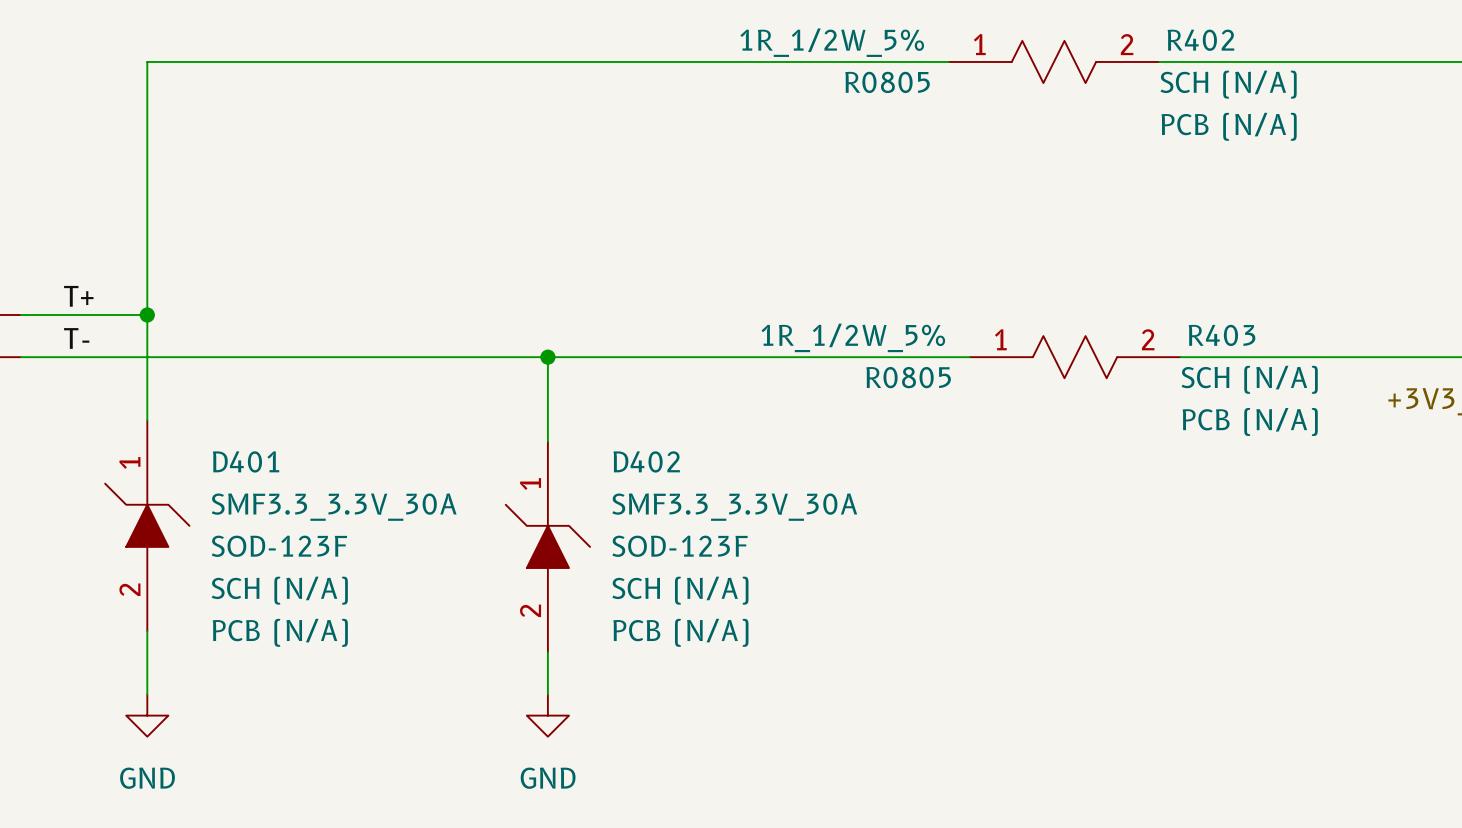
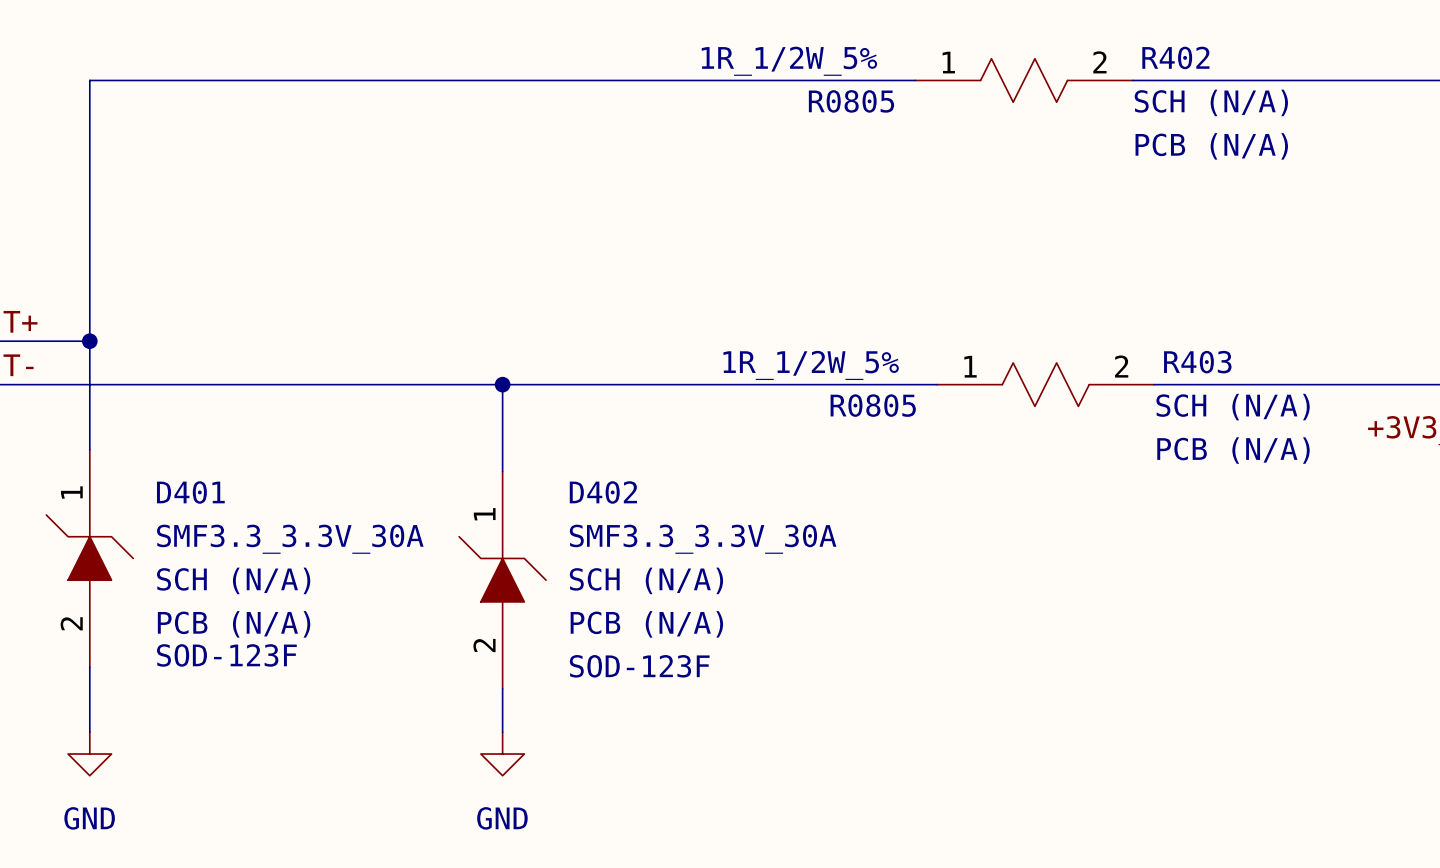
D401 text position: SOD-123F (279, 546) -> SOD-123F (226, 655)
D402 text position: SOD-123F (680, 546) -> SOD-123F (639, 666)
D401 text position: SCH (N/A) (279, 590) -> SCH (N/A) (233, 580)
D402 text position: SCH (N/A) (680, 590) -> SCH (N/A) (646, 580)
D401 text position: PCB (N/A) (280, 632) -> PCB (N/A) (234, 624)
D402 text position: PCB (N/A) (680, 632) -> PCB (N/A) (646, 624)

